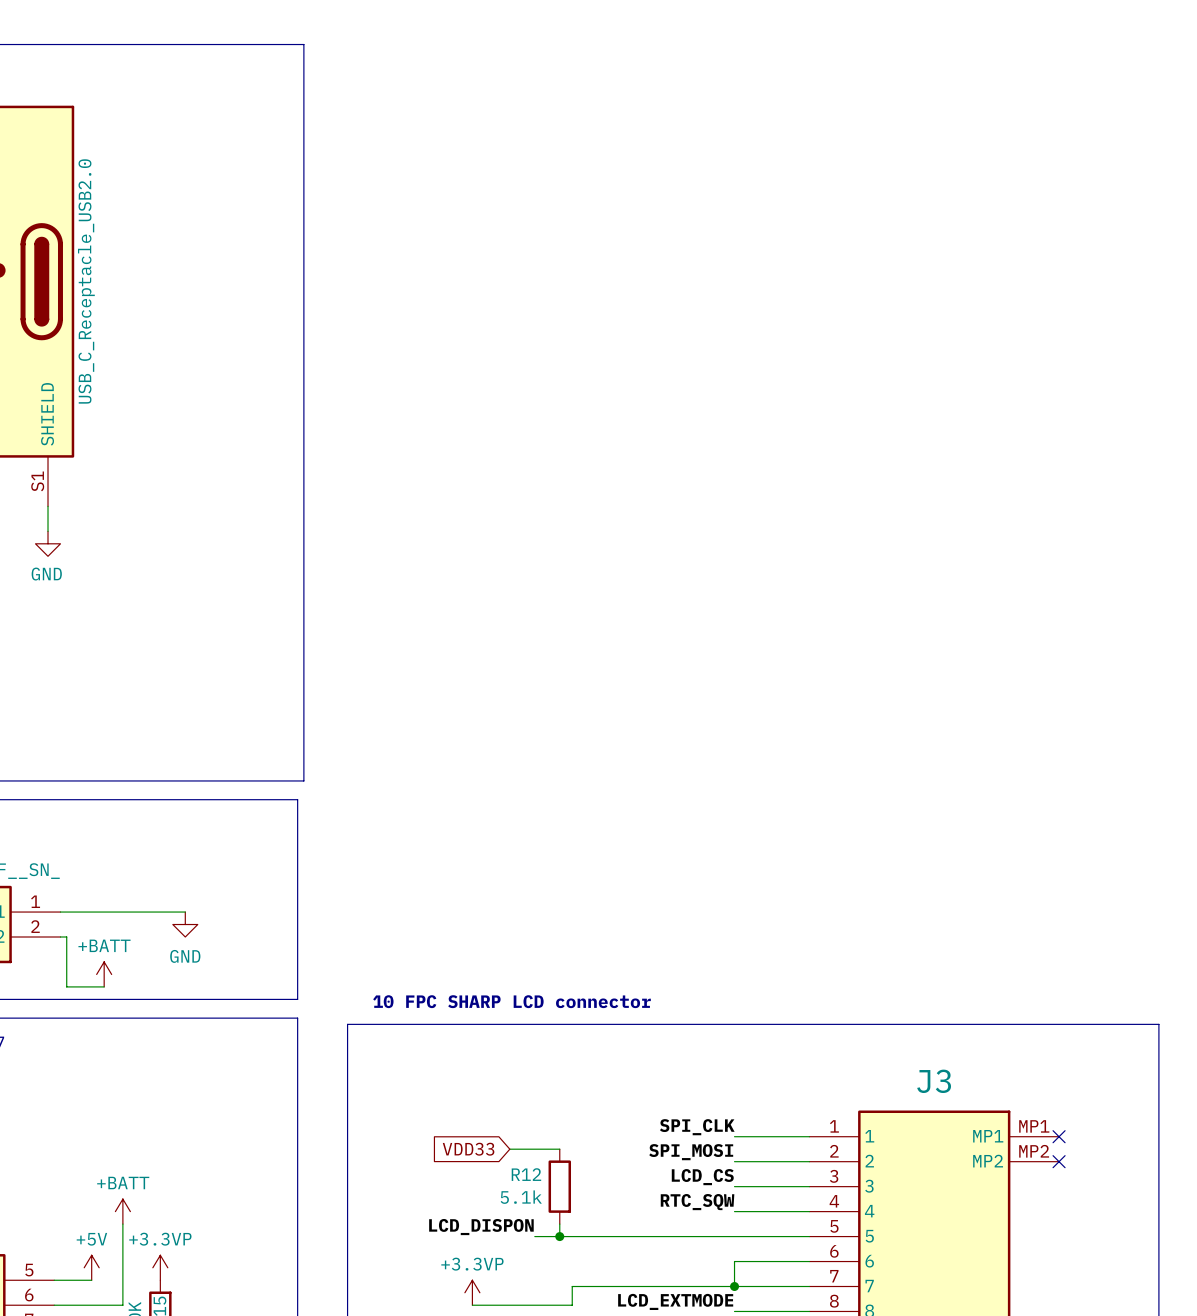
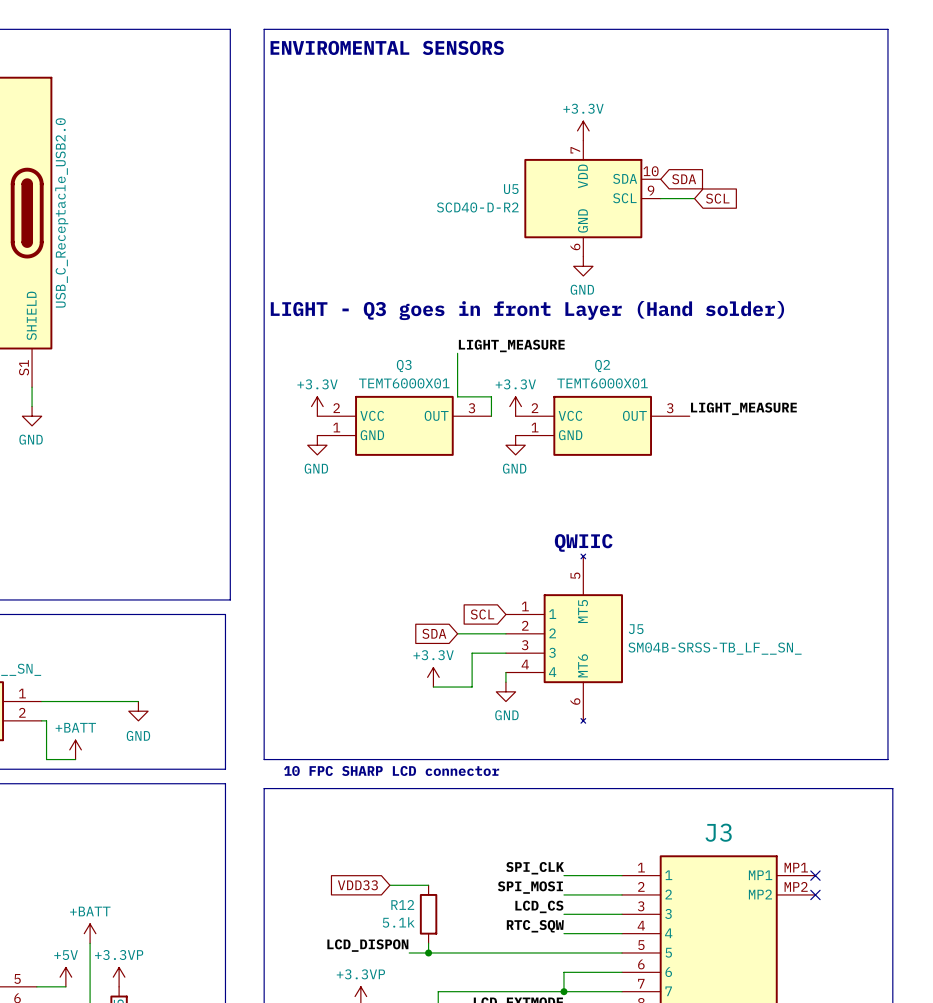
line: none -> (264, 29) (887, 29) (887, 759) (264, 759) (264, 29)
text: none -> ENVIROMENTAL SENSORS (387, 47)
power symbol: none -> +3.3V (583, 130)
global label: none -> SDA (684, 179)
U5: none -> SCD40-D-R2 (592, 198)
wire: none -> (660, 198) (694, 198)
global label: none -> SCL (717, 198)
power symbol: none -> GND (583, 266)
text: none -> LIGHT - Q3 goes in front Layer (Hand solder) (527, 310)
label: none -> LIGHT_MEASURE (511, 345)
wire: none -> (457, 353) (457, 396) (491, 396) (491, 416)
power symbol: none -> +3.3V (317, 406)
power symbol: none -> +3.3V (515, 406)
label: none -> LIGHT_MEASURE (743, 408)
Q3: none -> TEMT6000X01 (404, 425)
Q2: none -> TEMT6000X01 (602, 425)
power symbol: none -> GND (317, 445)
power symbol: none -> GND (515, 445)
text: none -> QWIIC (583, 542)
global label: none -> SCL (482, 614)
global label: none -> SDA (434, 633)
wire: none -> (457, 633) (505, 633)
J5: none -> SM04B-SRSS-TB_LF__SN_ (564, 638)
wire: none -> (505, 653) (472, 653) (472, 687) (433, 687)
wire: none -> (505, 672) (505, 682)
power symbol: none -> +3.3V (433, 677)
power symbol: none -> GND (505, 691)

